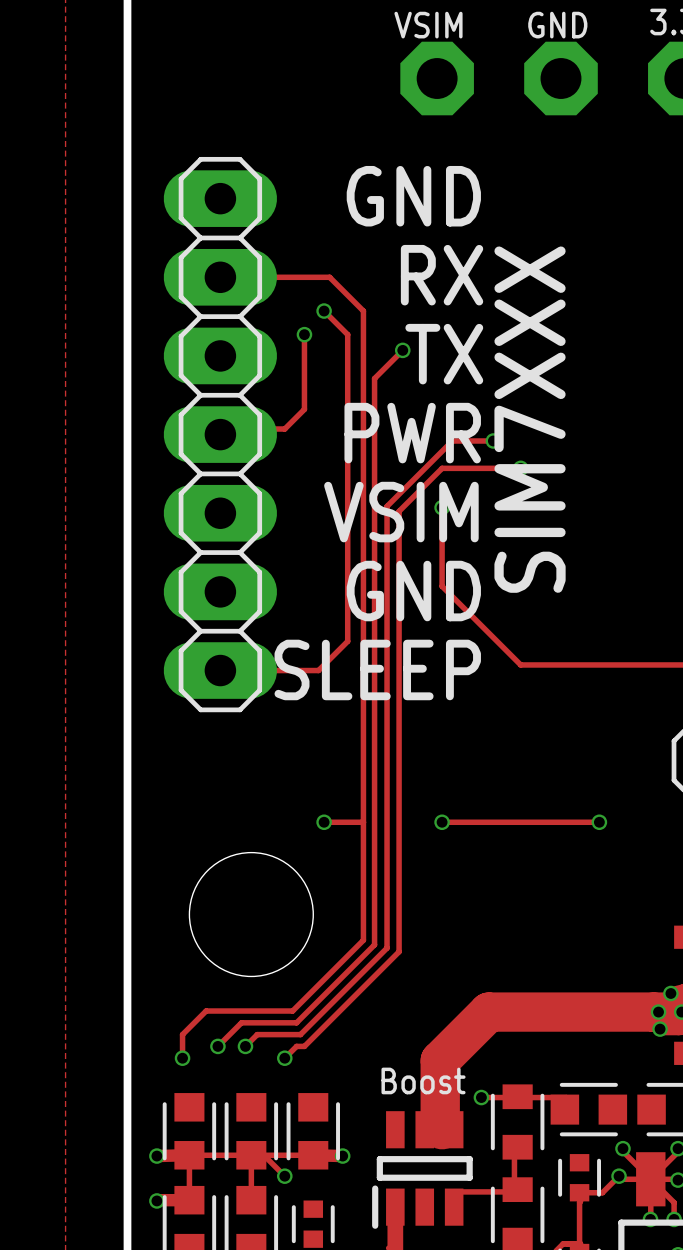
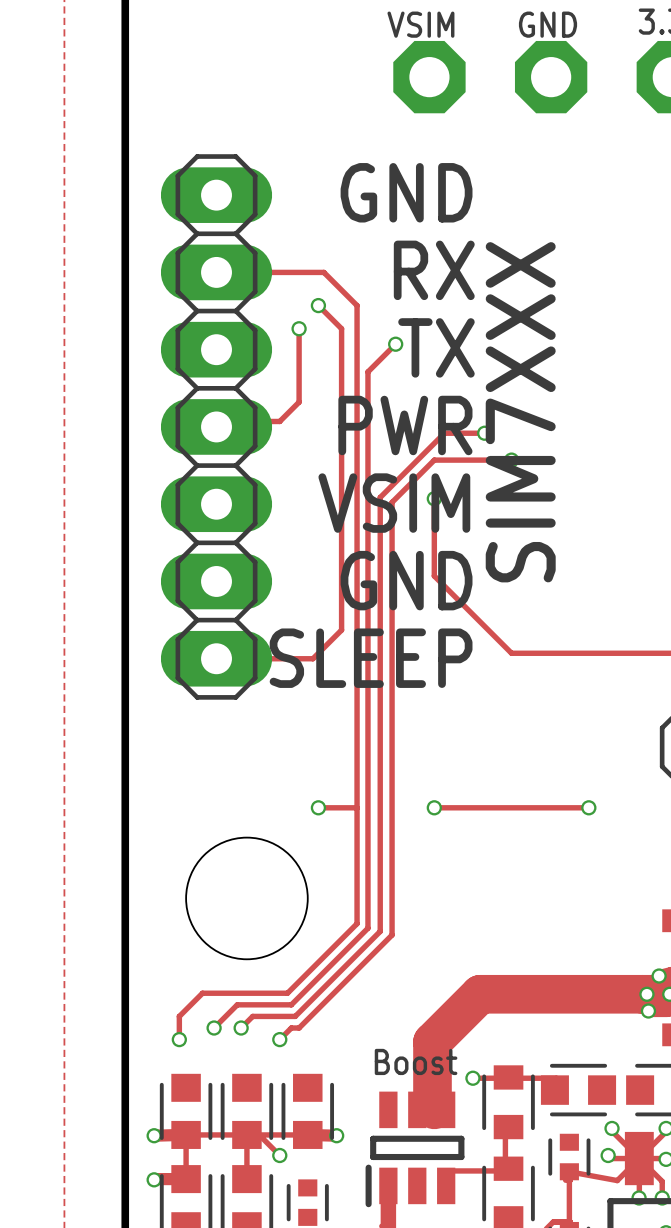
track: (619, 1176) (602, 1192) (579, 1192) -> none
track: none -> (639, 1158) (617, 1180) (569, 1171) (565, 1180)

